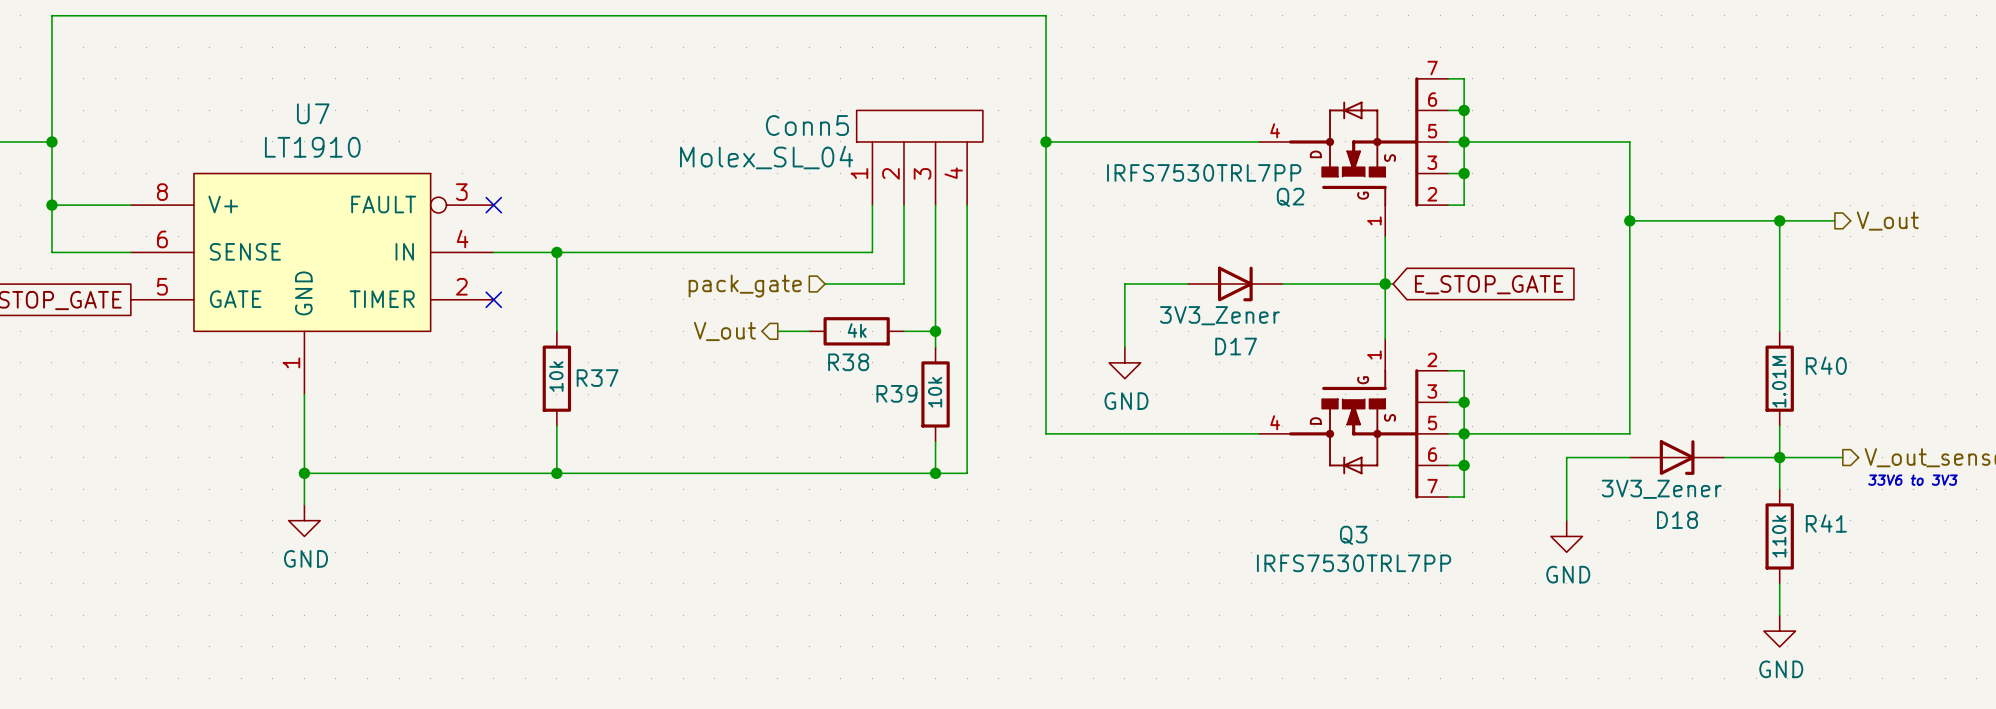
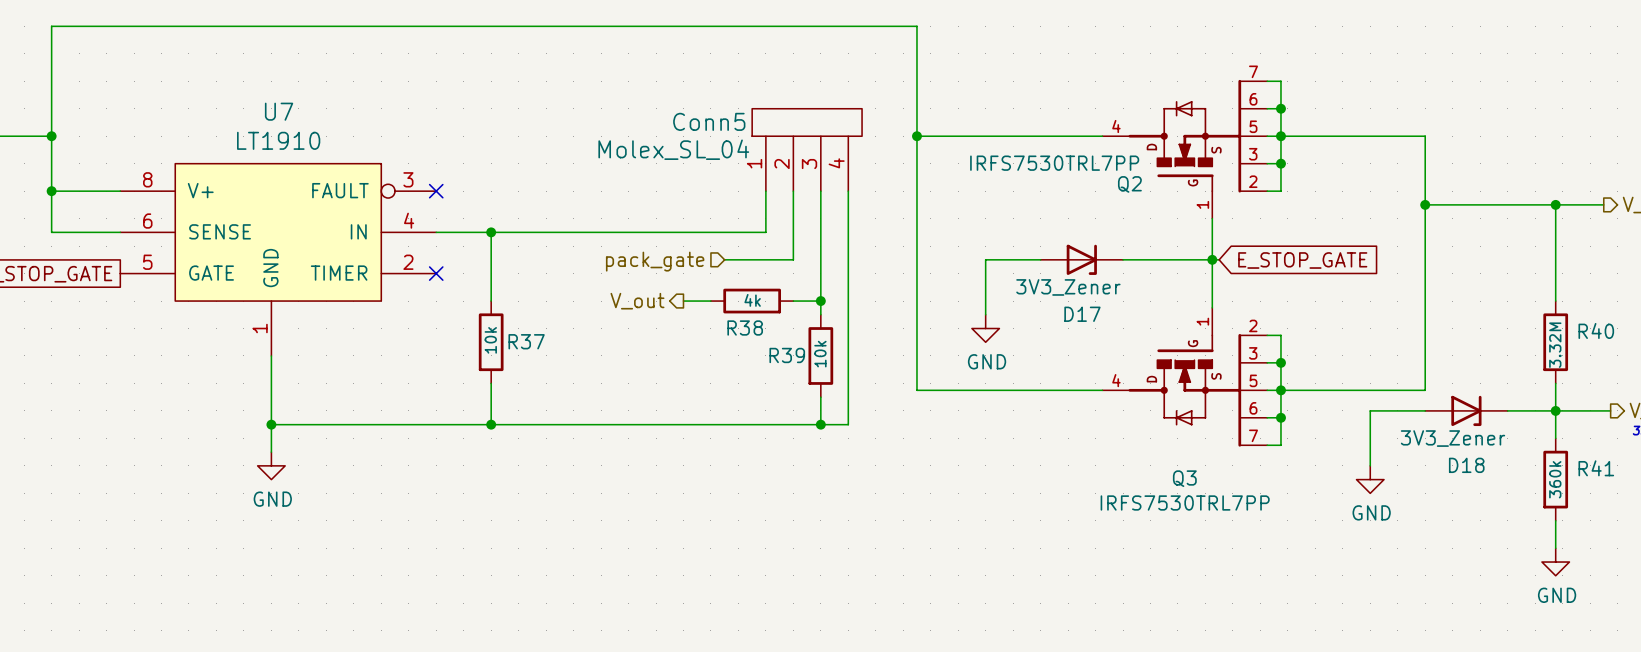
R40 value: 1.01M (1779, 381) -> 3.32M (1555, 345)
R41 value: 110k (1779, 536) -> 360k (1555, 479)

